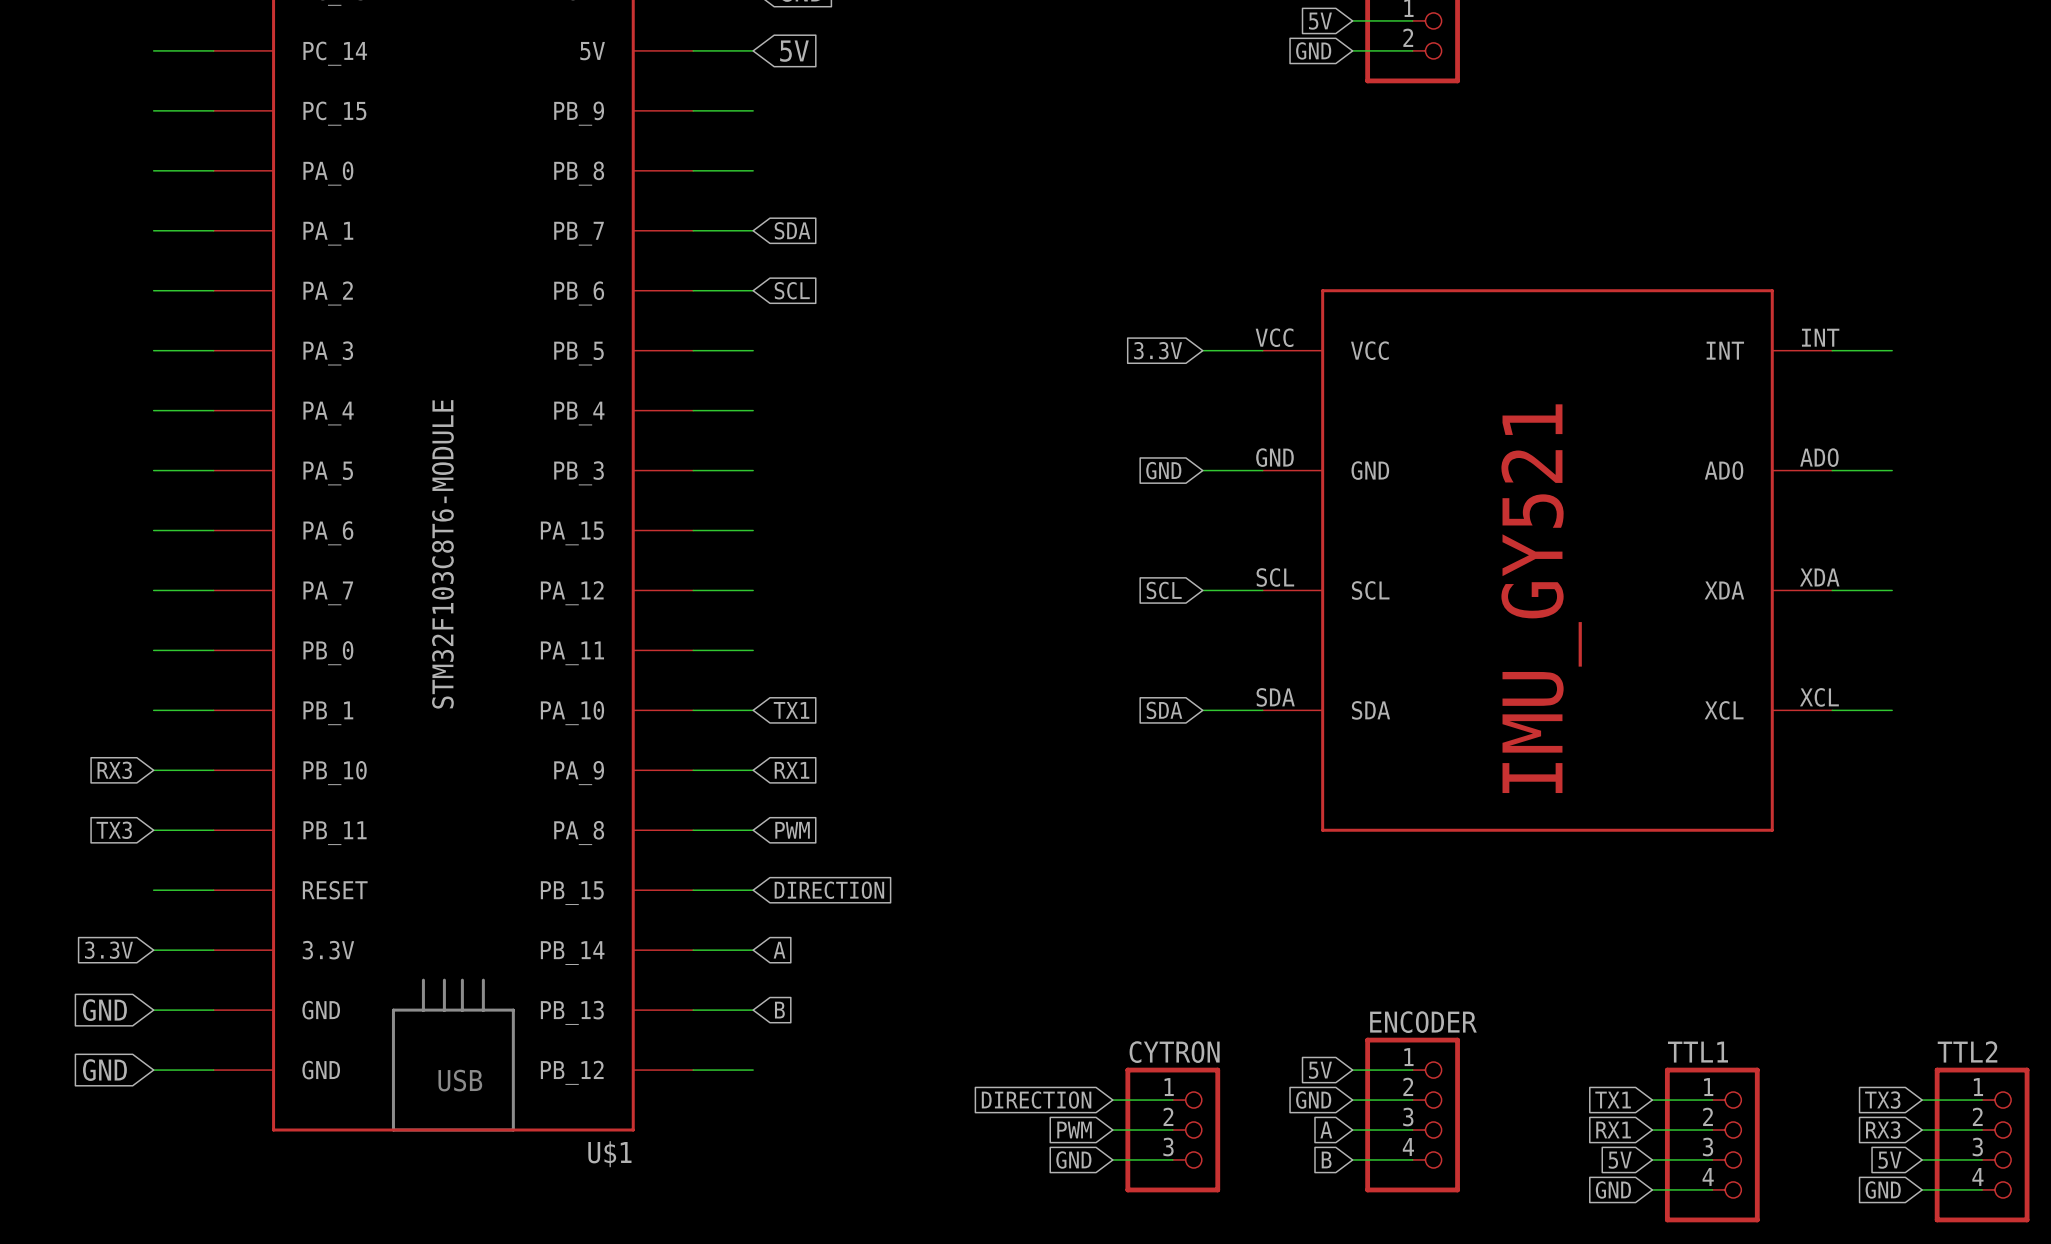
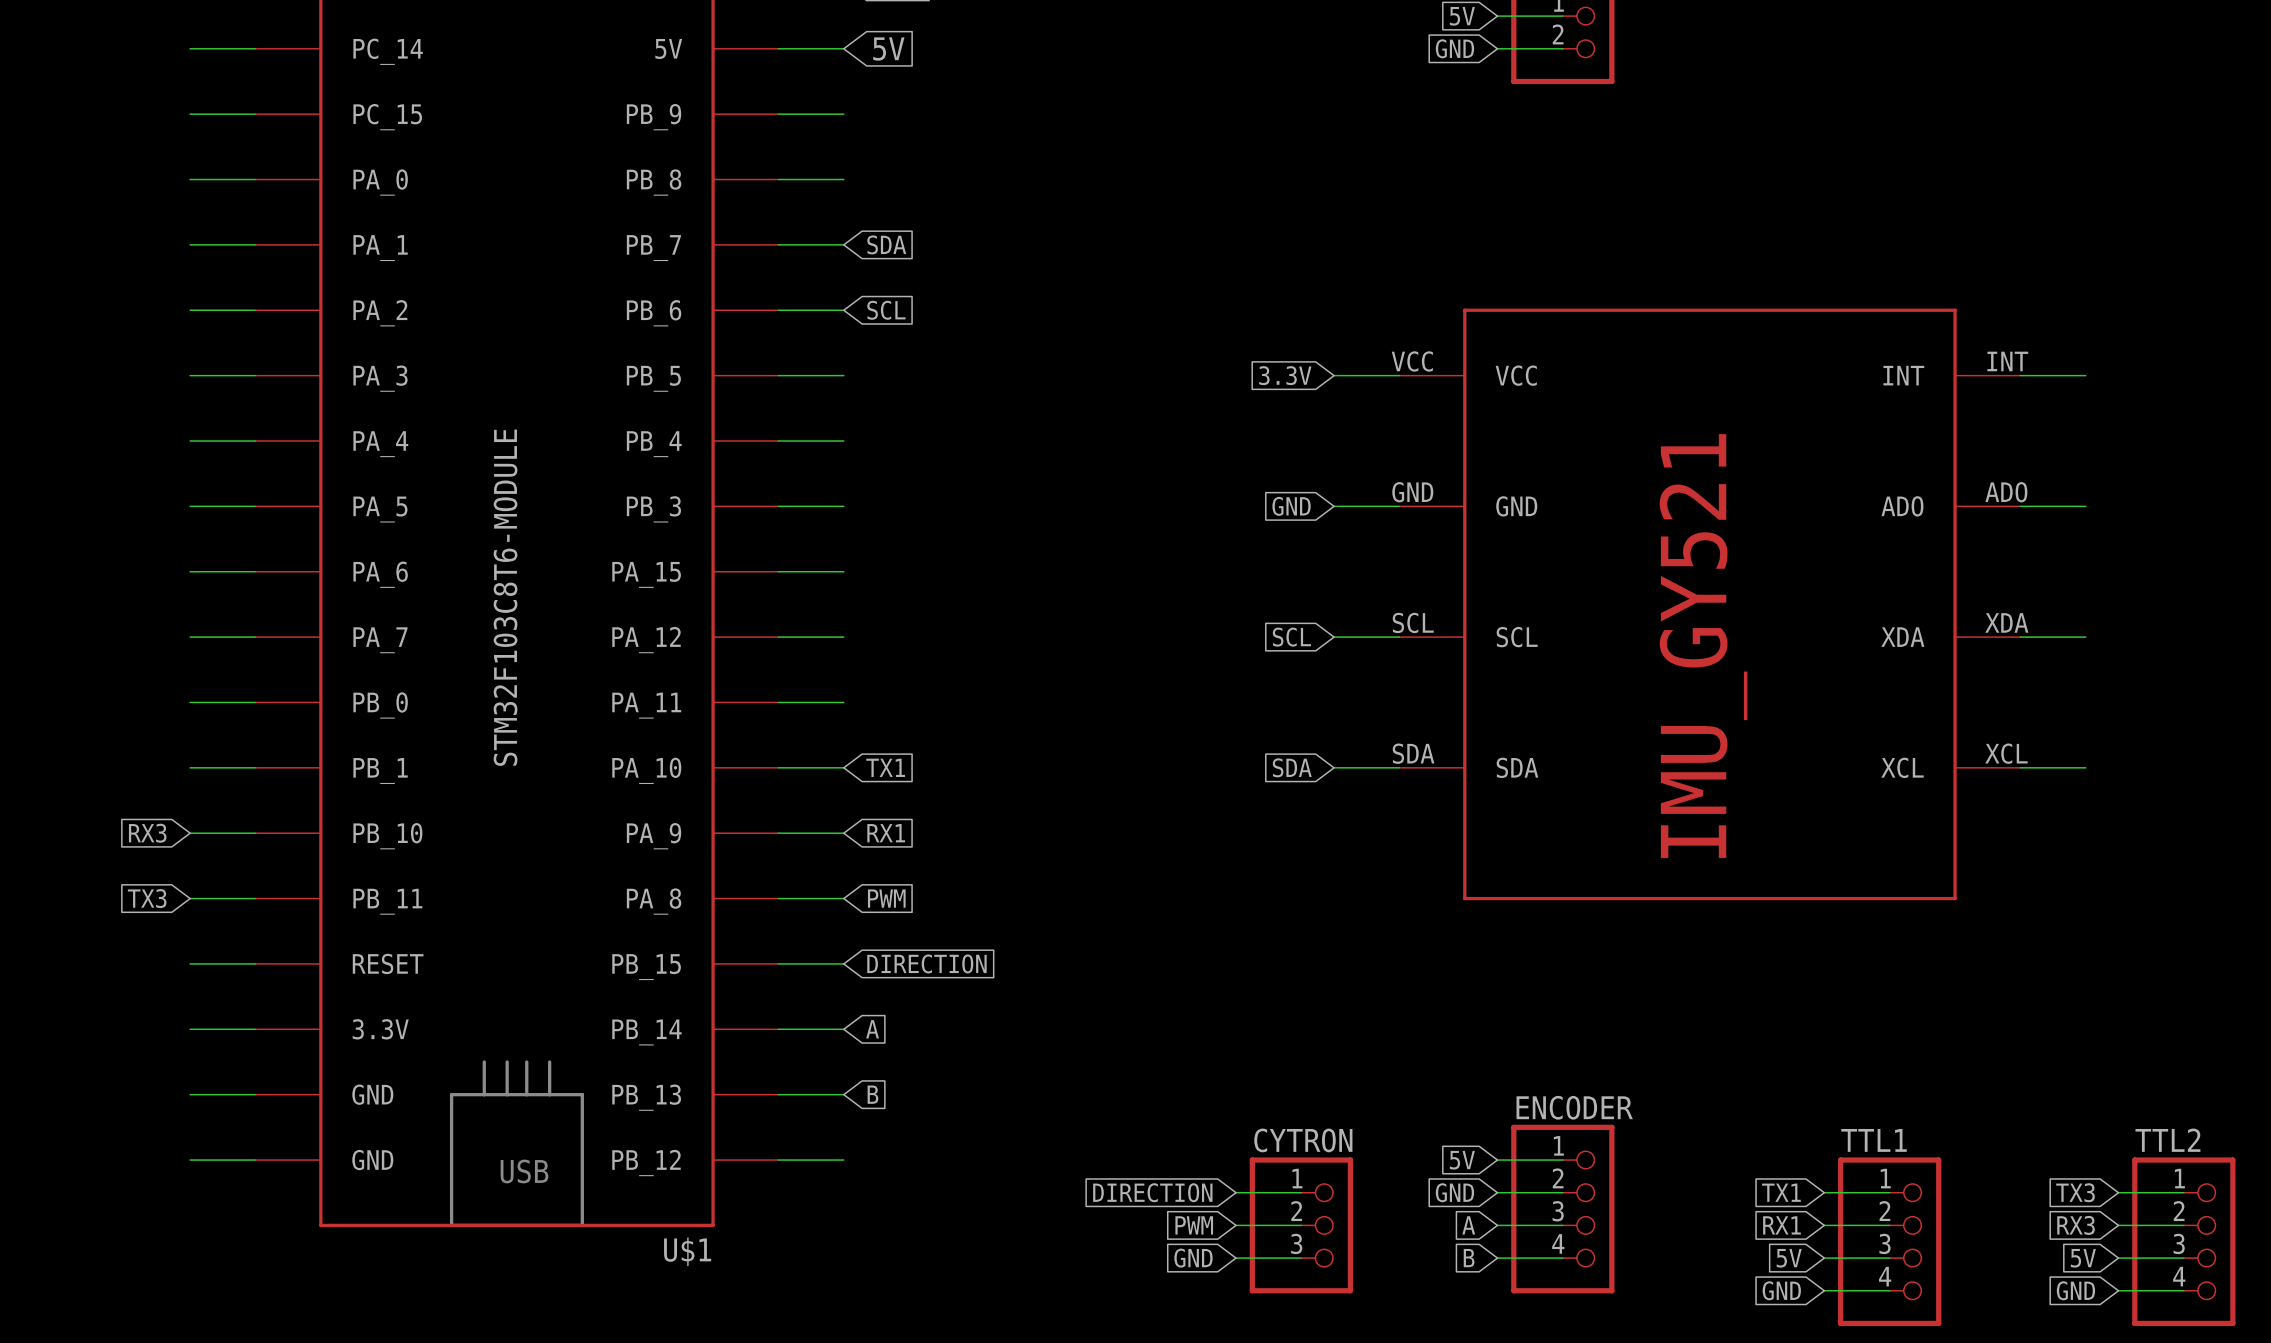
global label: 3.3V (108, 950) -> none
global label: GND (104, 1010) -> none
global label: GND (104, 1070) -> none

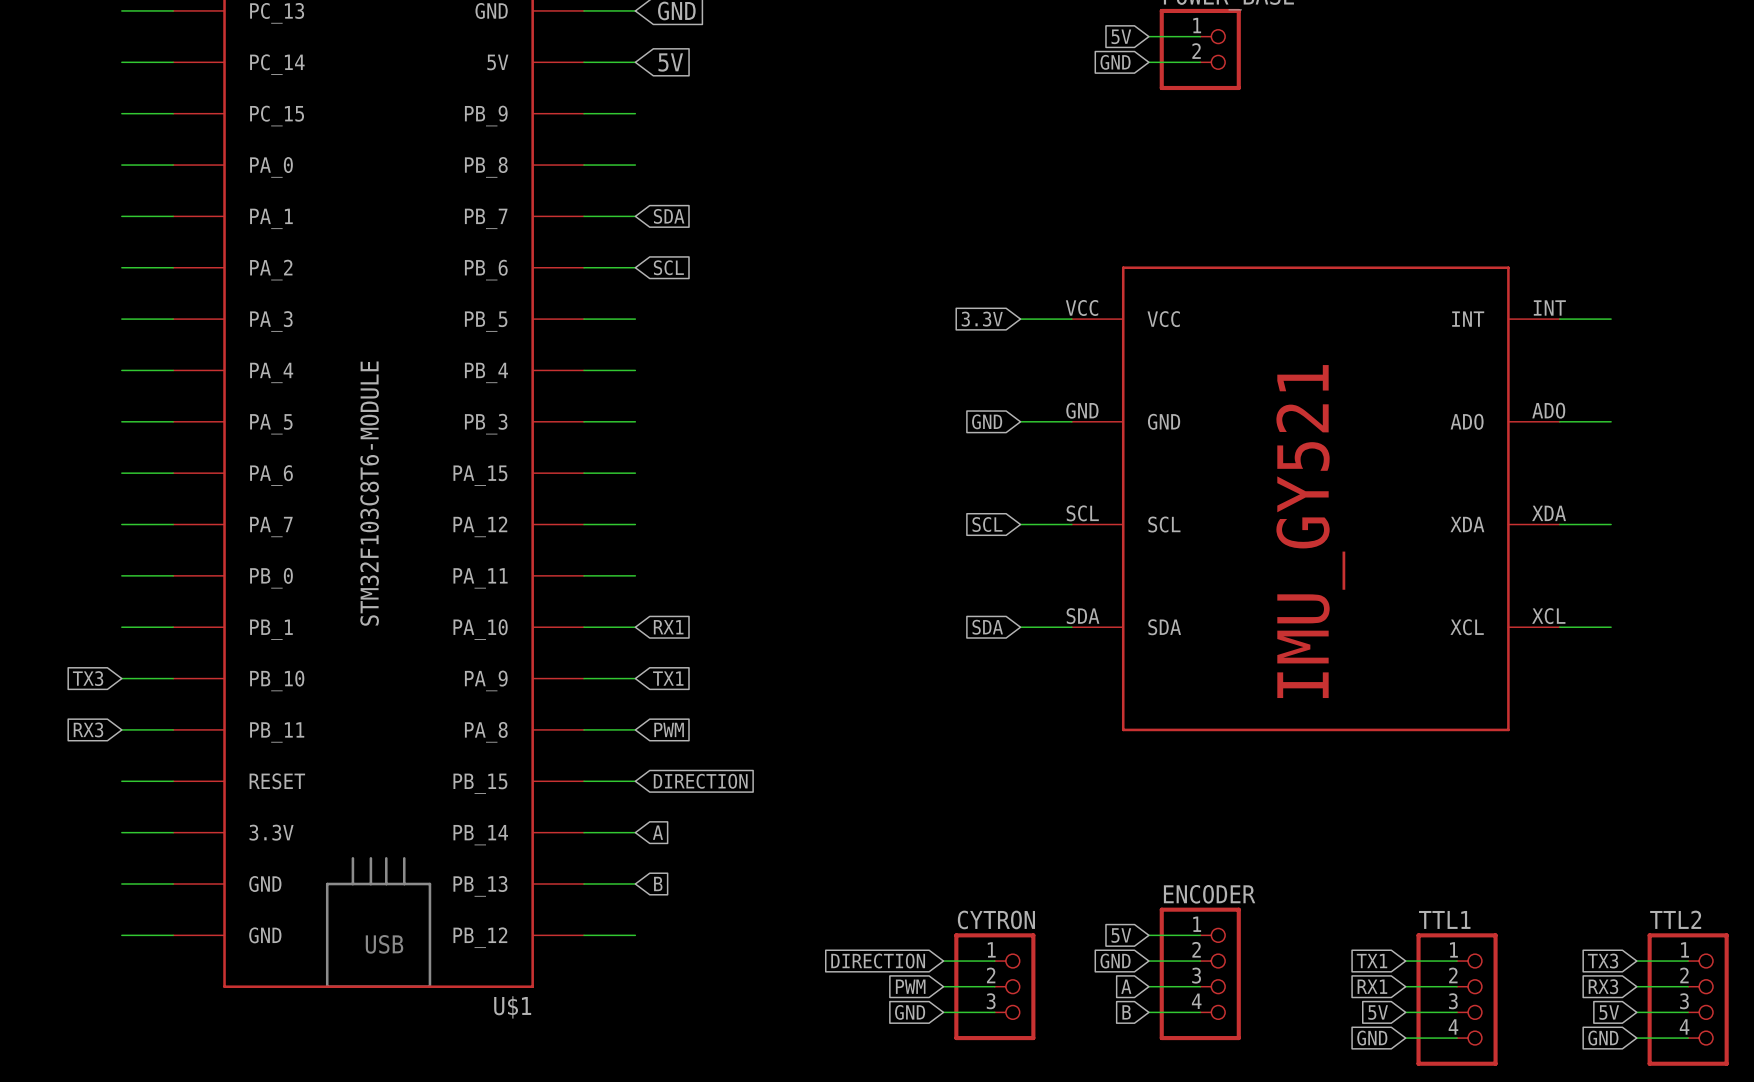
global label: TX1 (885, 767) -> RX1 (668, 627)
global label: RX3 (147, 833) -> TX3 (88, 678)
global label: RX1 (886, 833) -> TX1 (668, 678)
global label: TX3 (147, 898) -> RX3 (88, 729)

